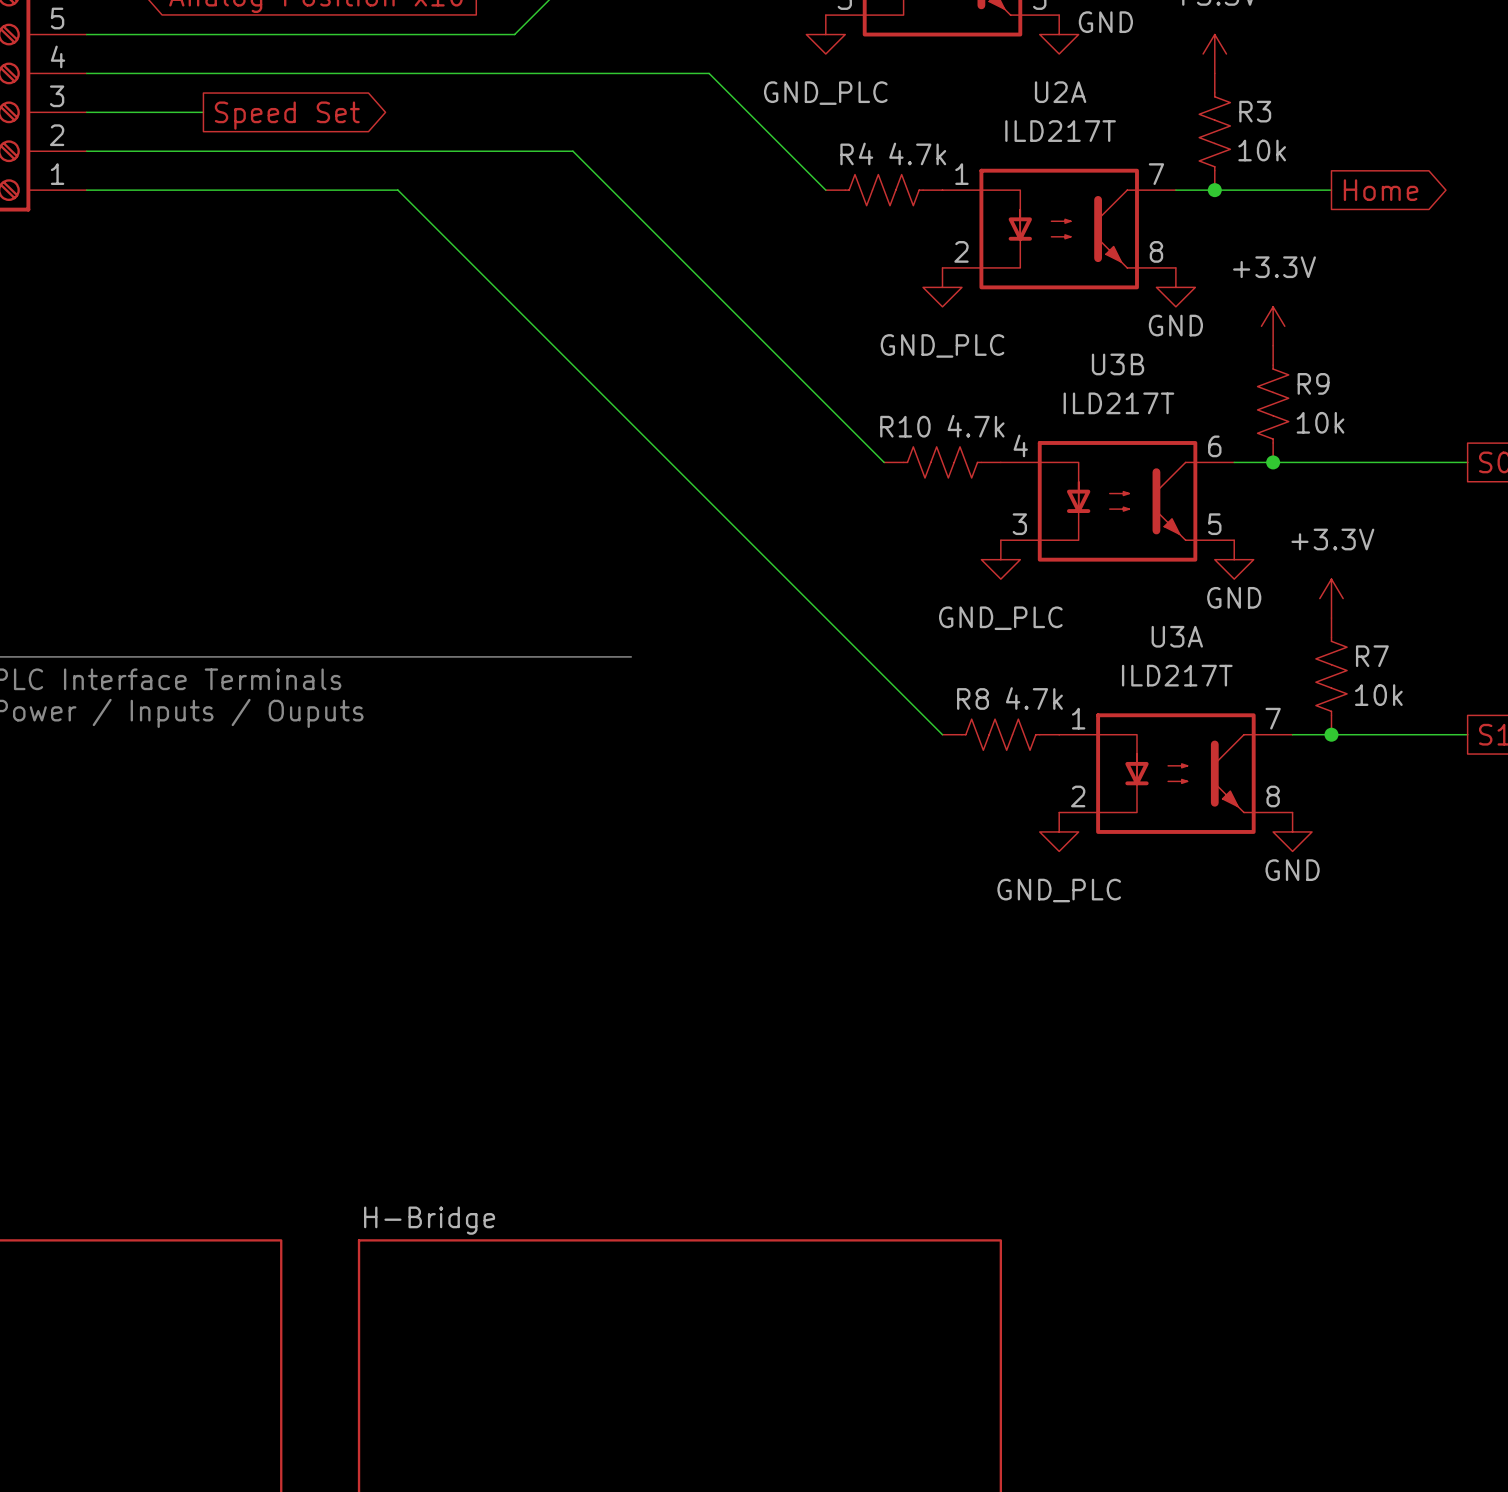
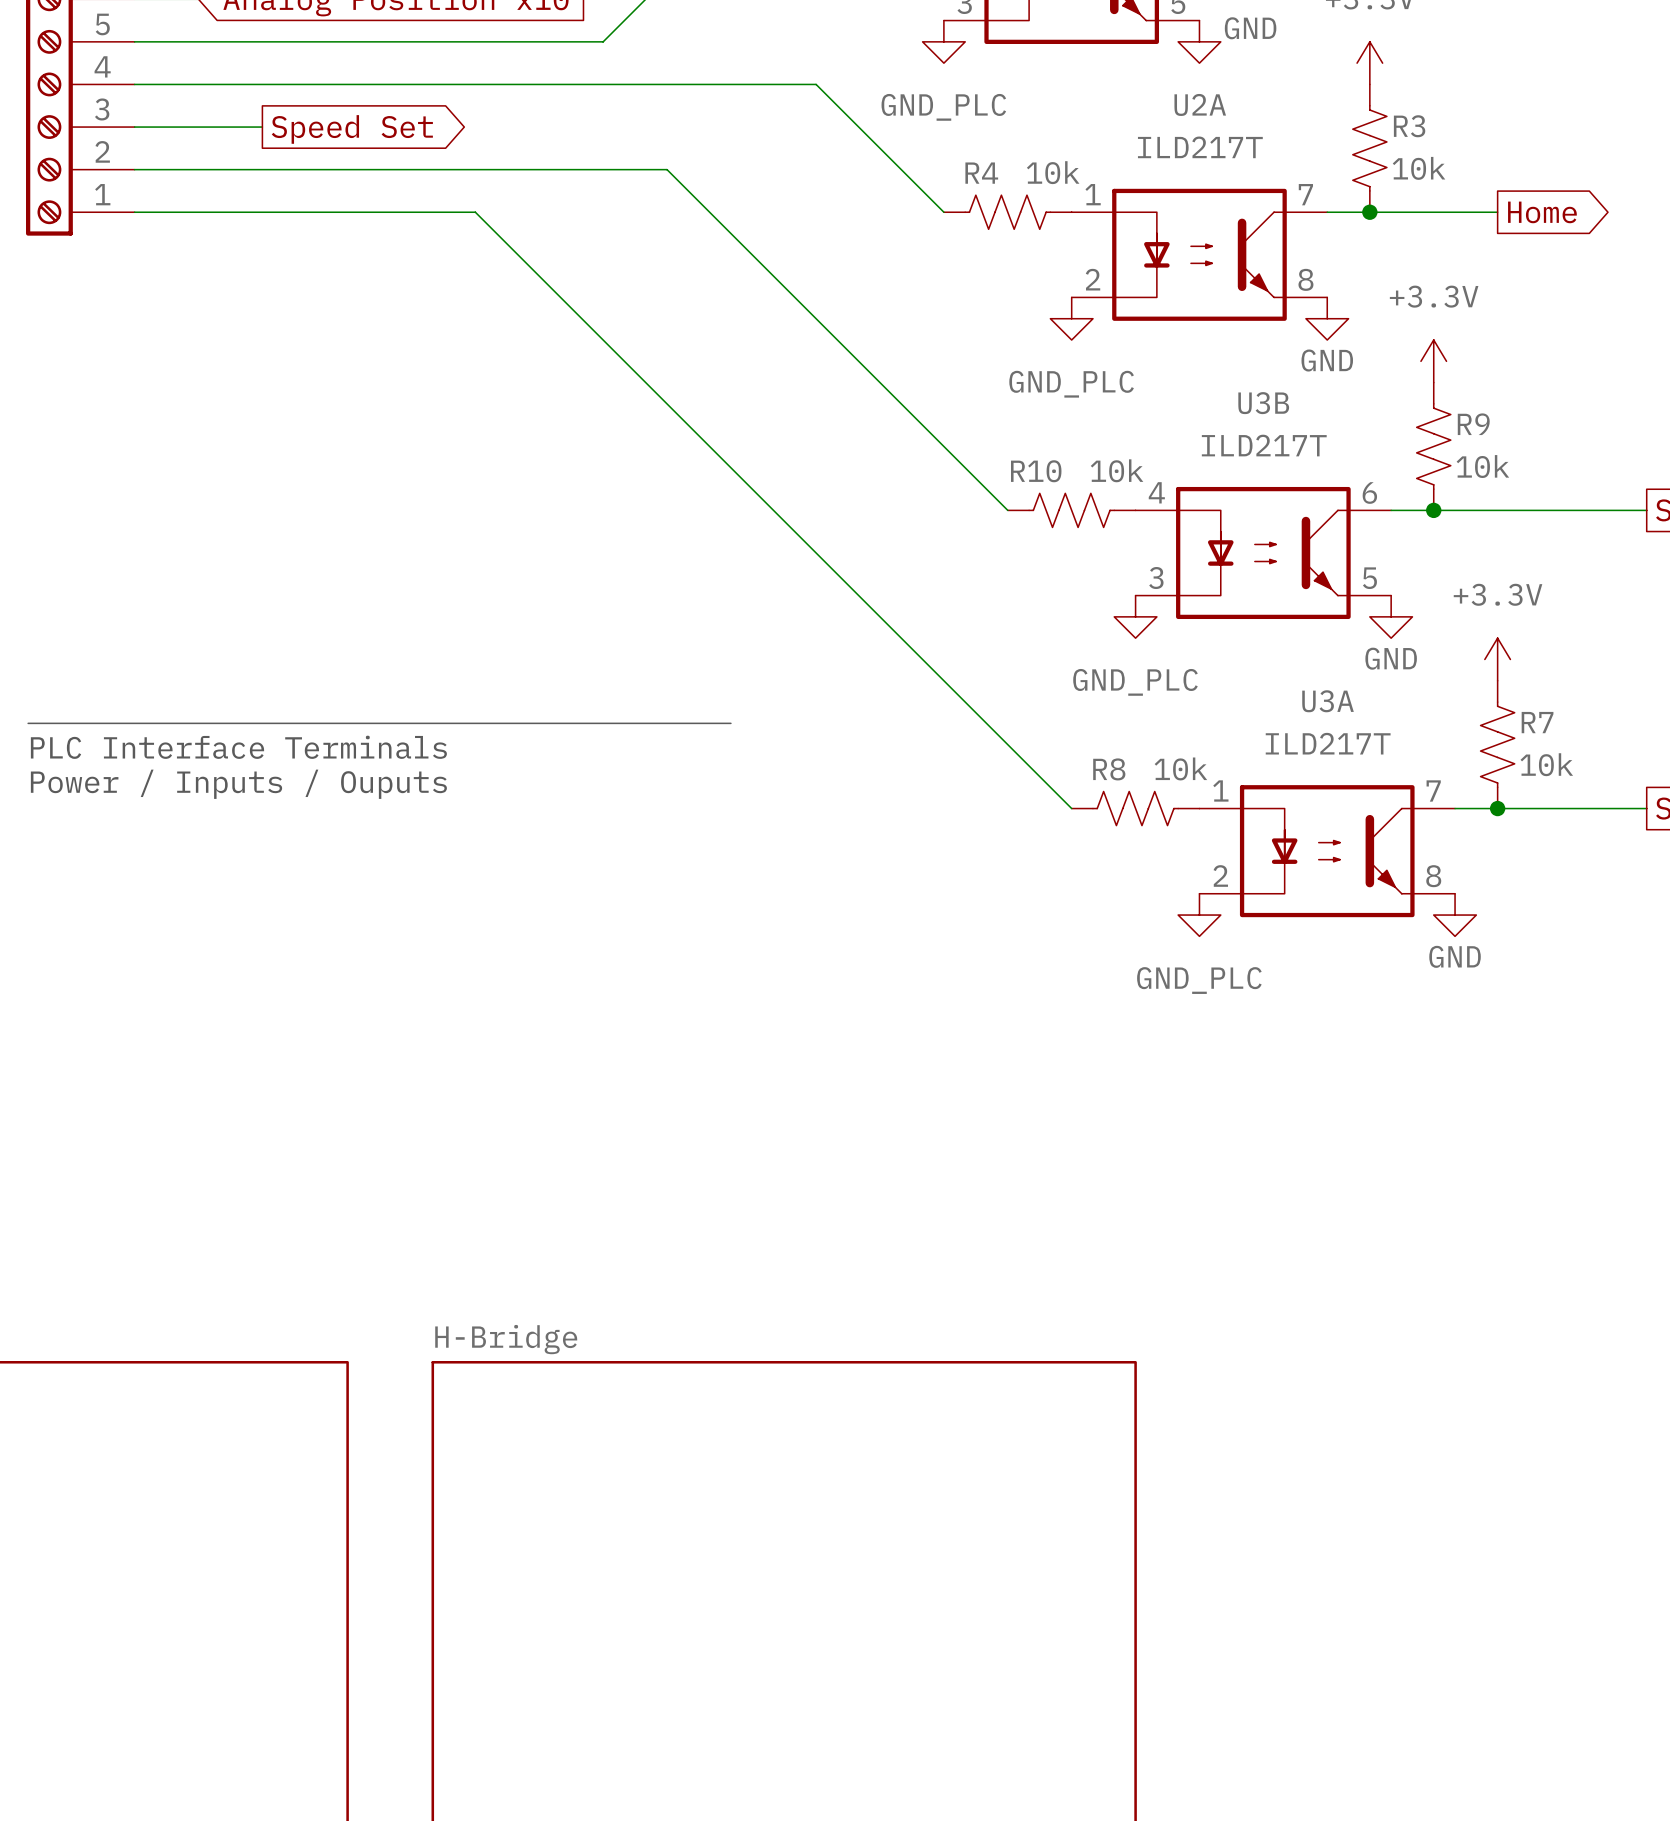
R4 value: 4.7k (917, 153) -> 10k (1053, 172)
R10 value: 4.7k (976, 426) -> 10k (1117, 470)
R8 value: 4.7k (1034, 698) -> 10k (1180, 768)

